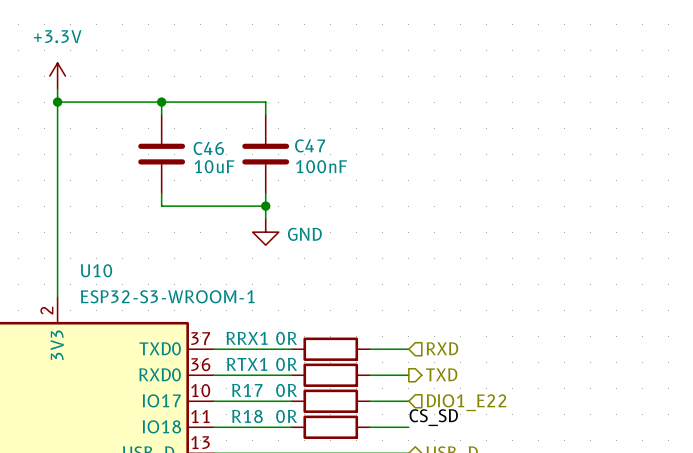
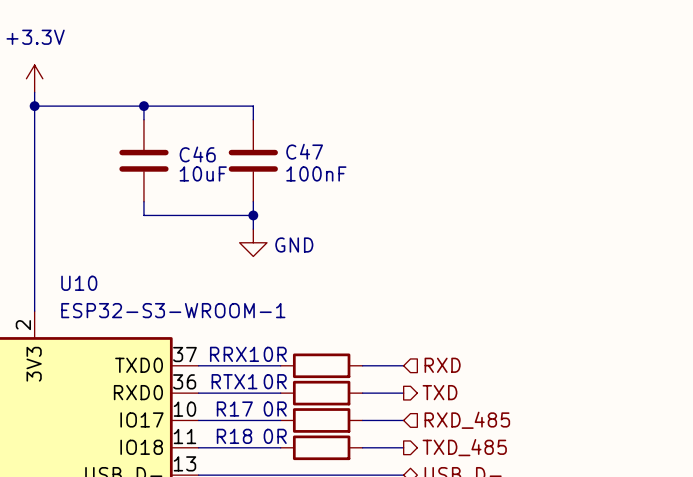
hierarchical label: DIO1_E22 (466, 402) -> RXD_485 (467, 420)
label: CS_SD (433, 417) -> none
hierarchical label: none -> TXD_485 (464, 447)

